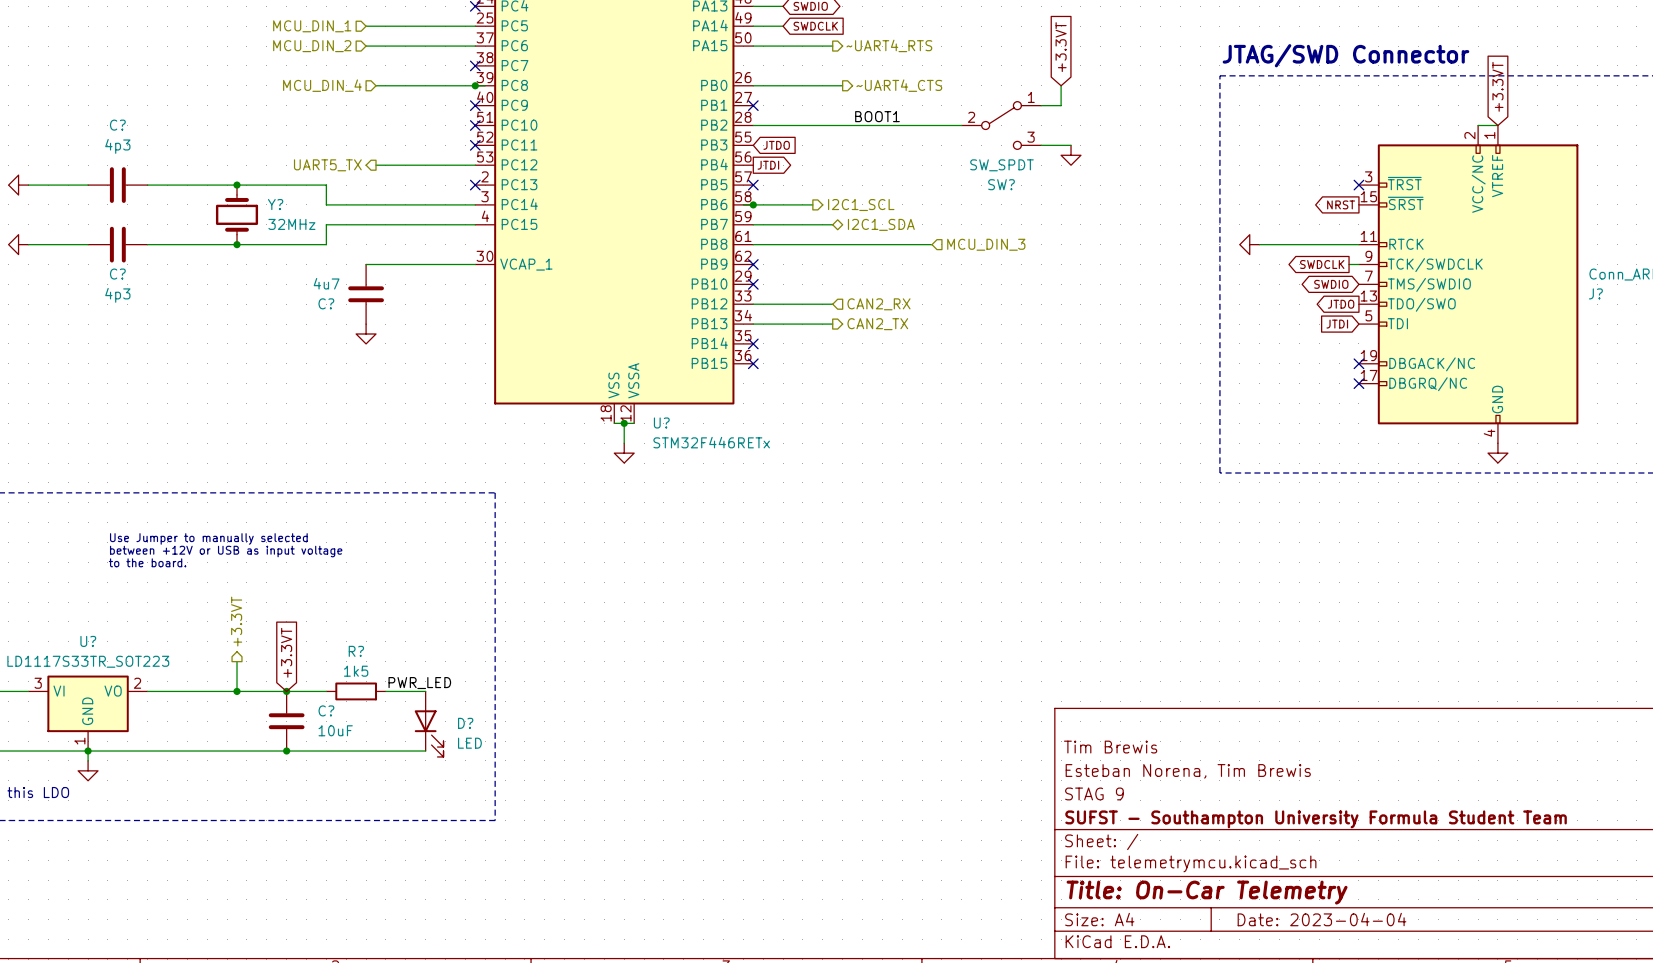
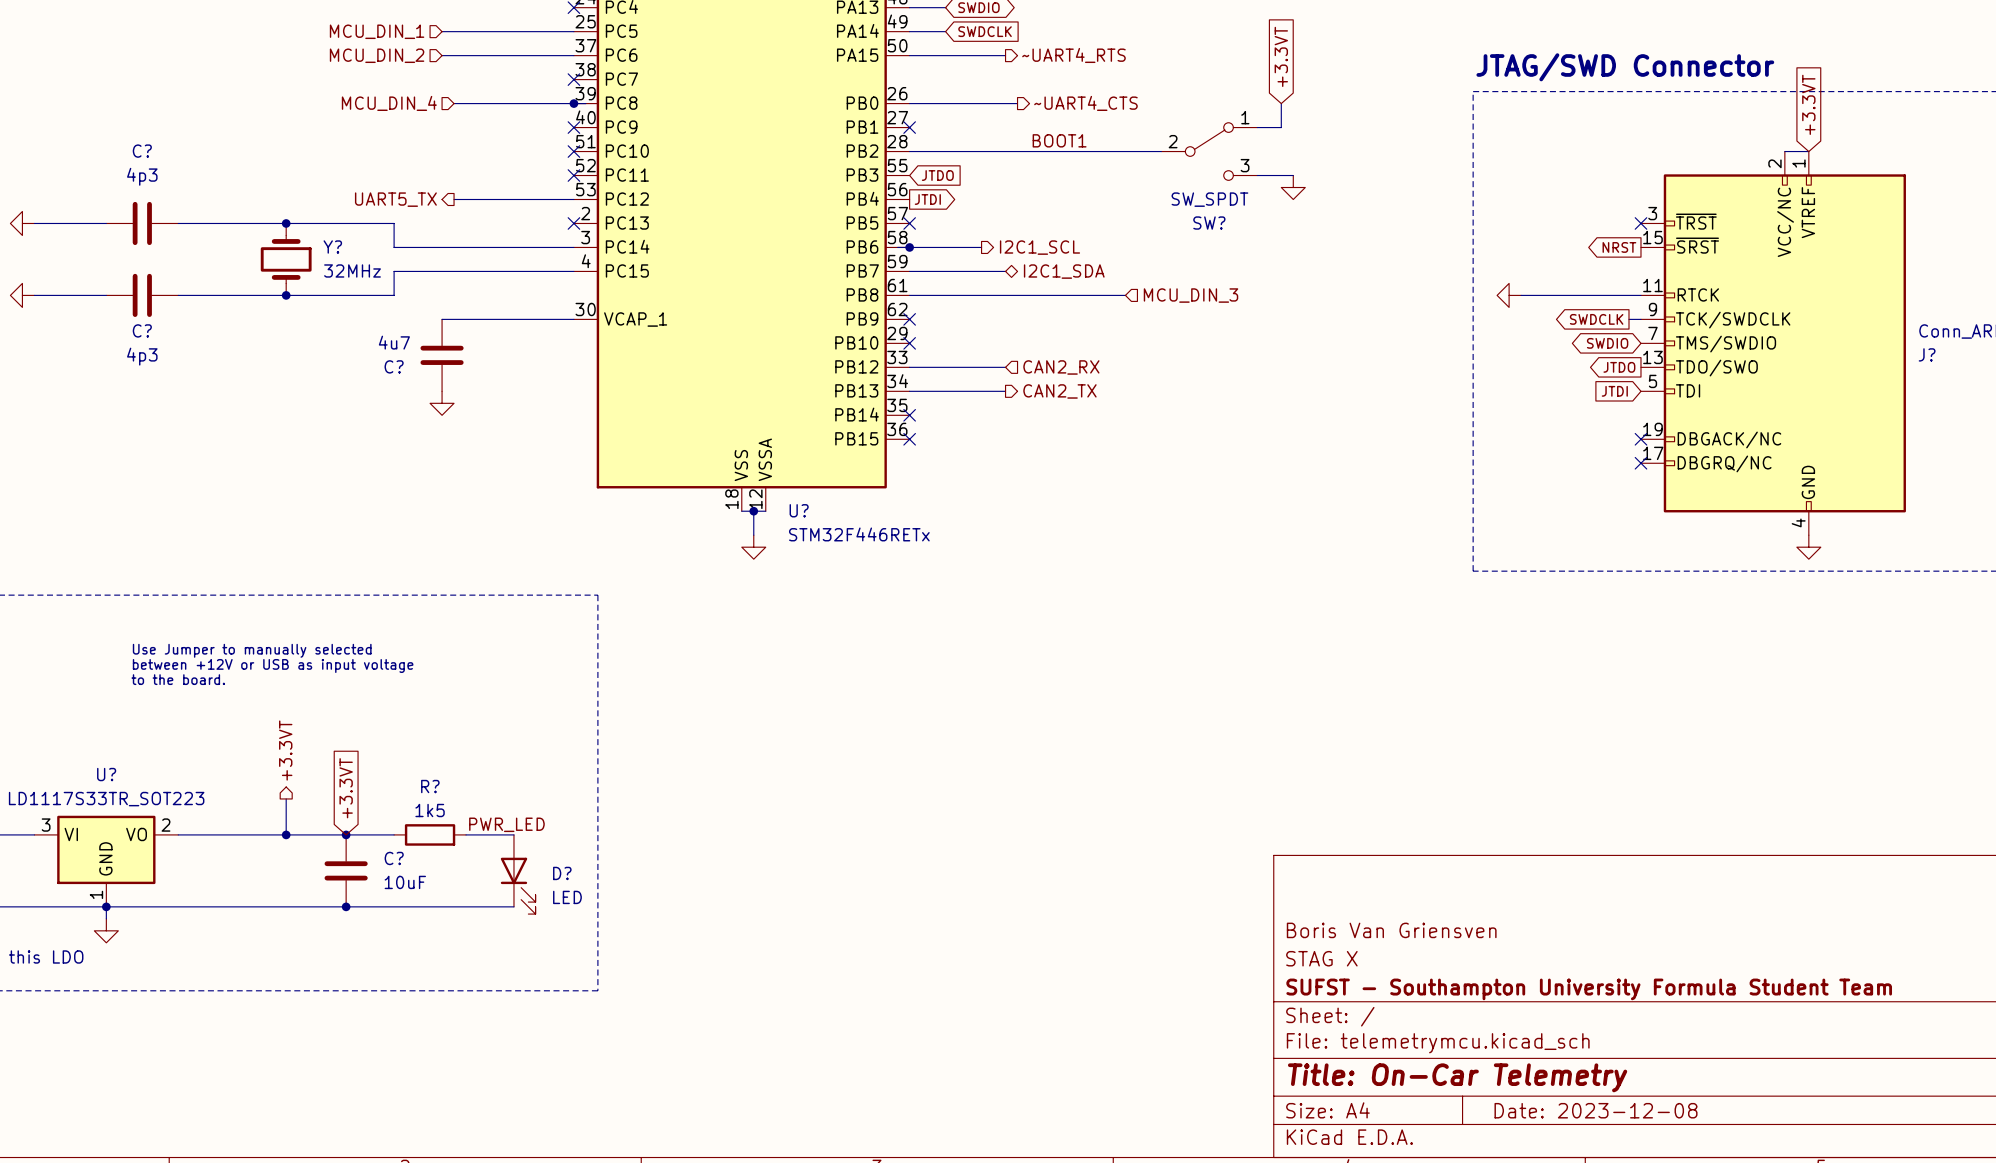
title block: Tim Brewis (1110, 747) -> none
title block: Esteban Norena, Tim Brewis (1188, 771) -> Boris Van Griensven (1391, 930)
title block: STAG 9 (1094, 793) -> STAG X (1321, 958)
title block: Date: 2023-04-04 (1321, 919) -> Date: 2023-12-08 (1596, 1110)

